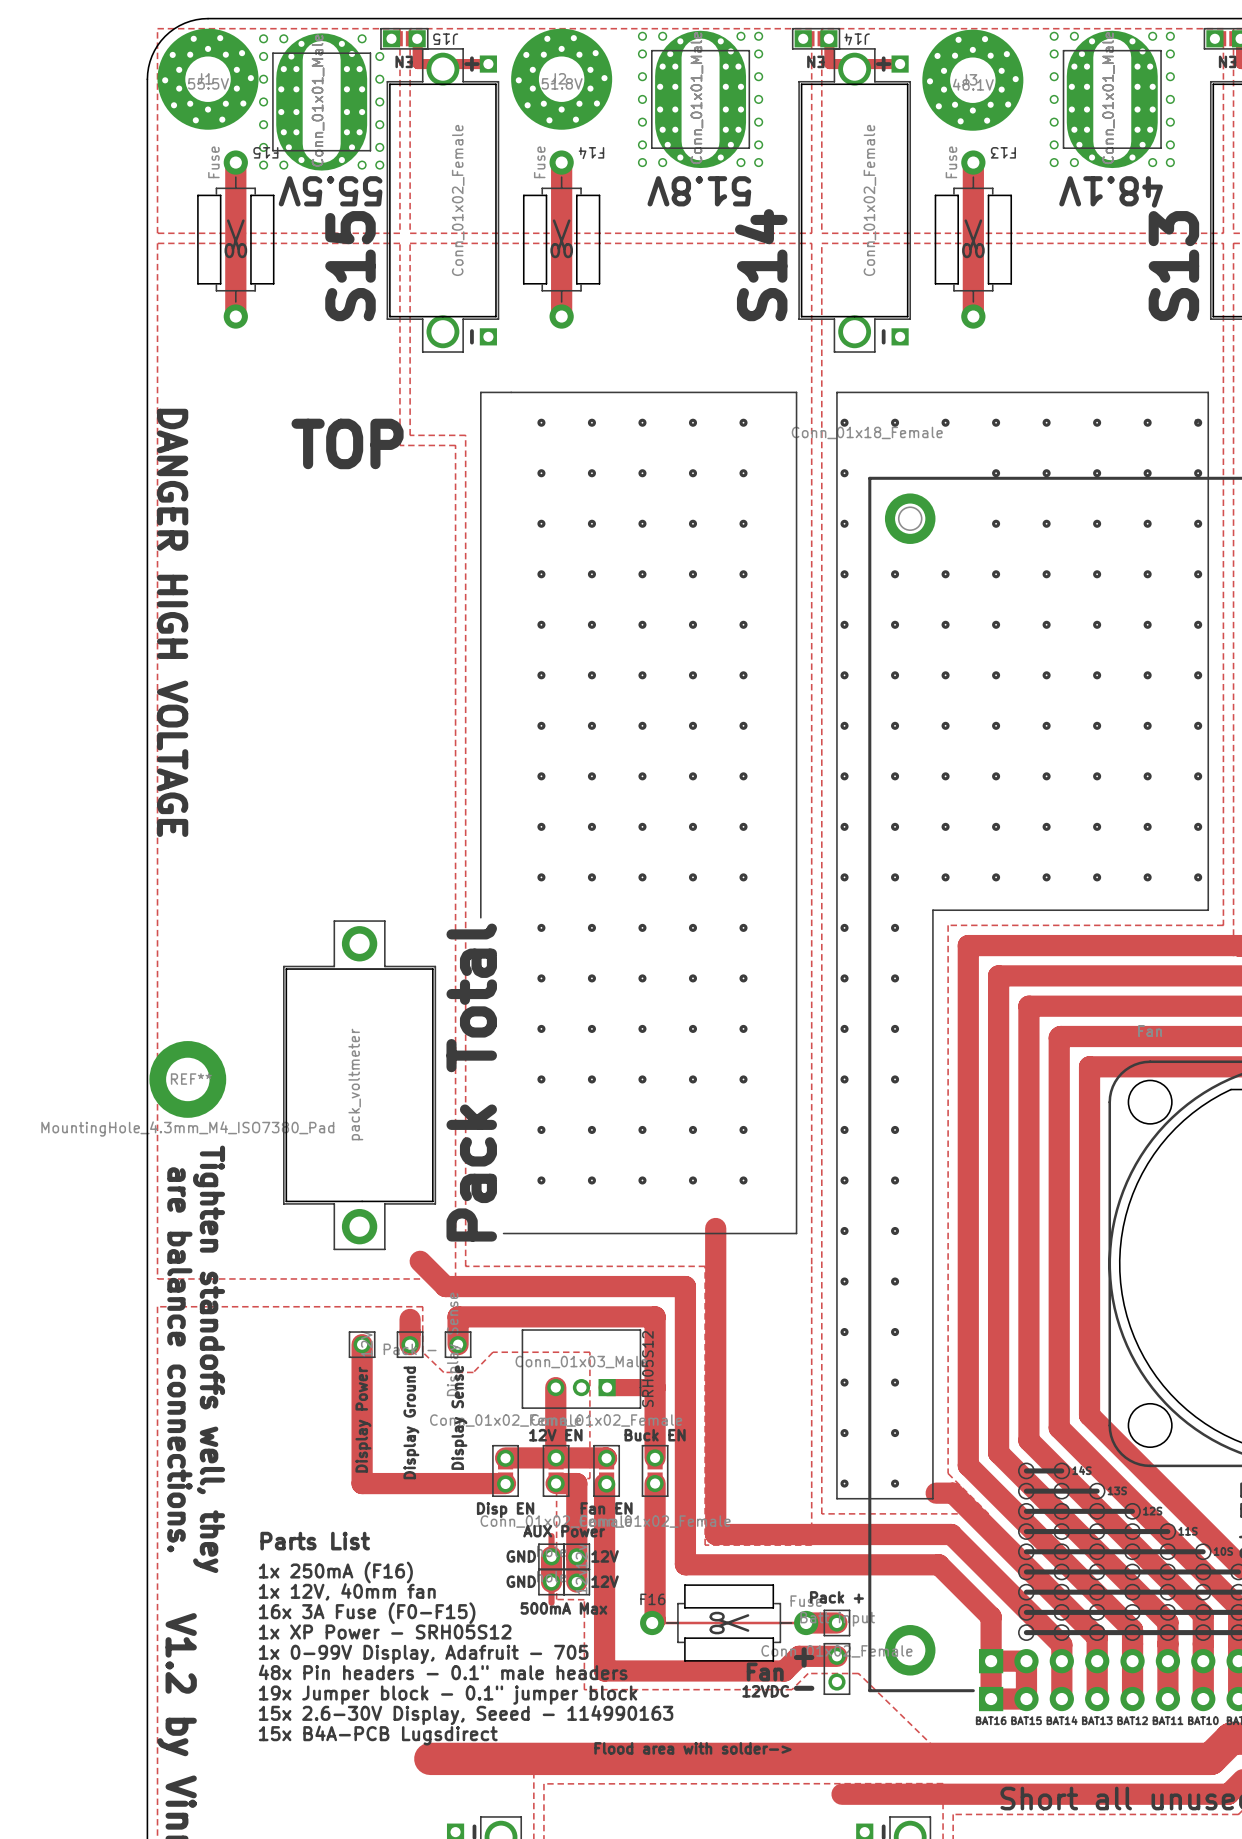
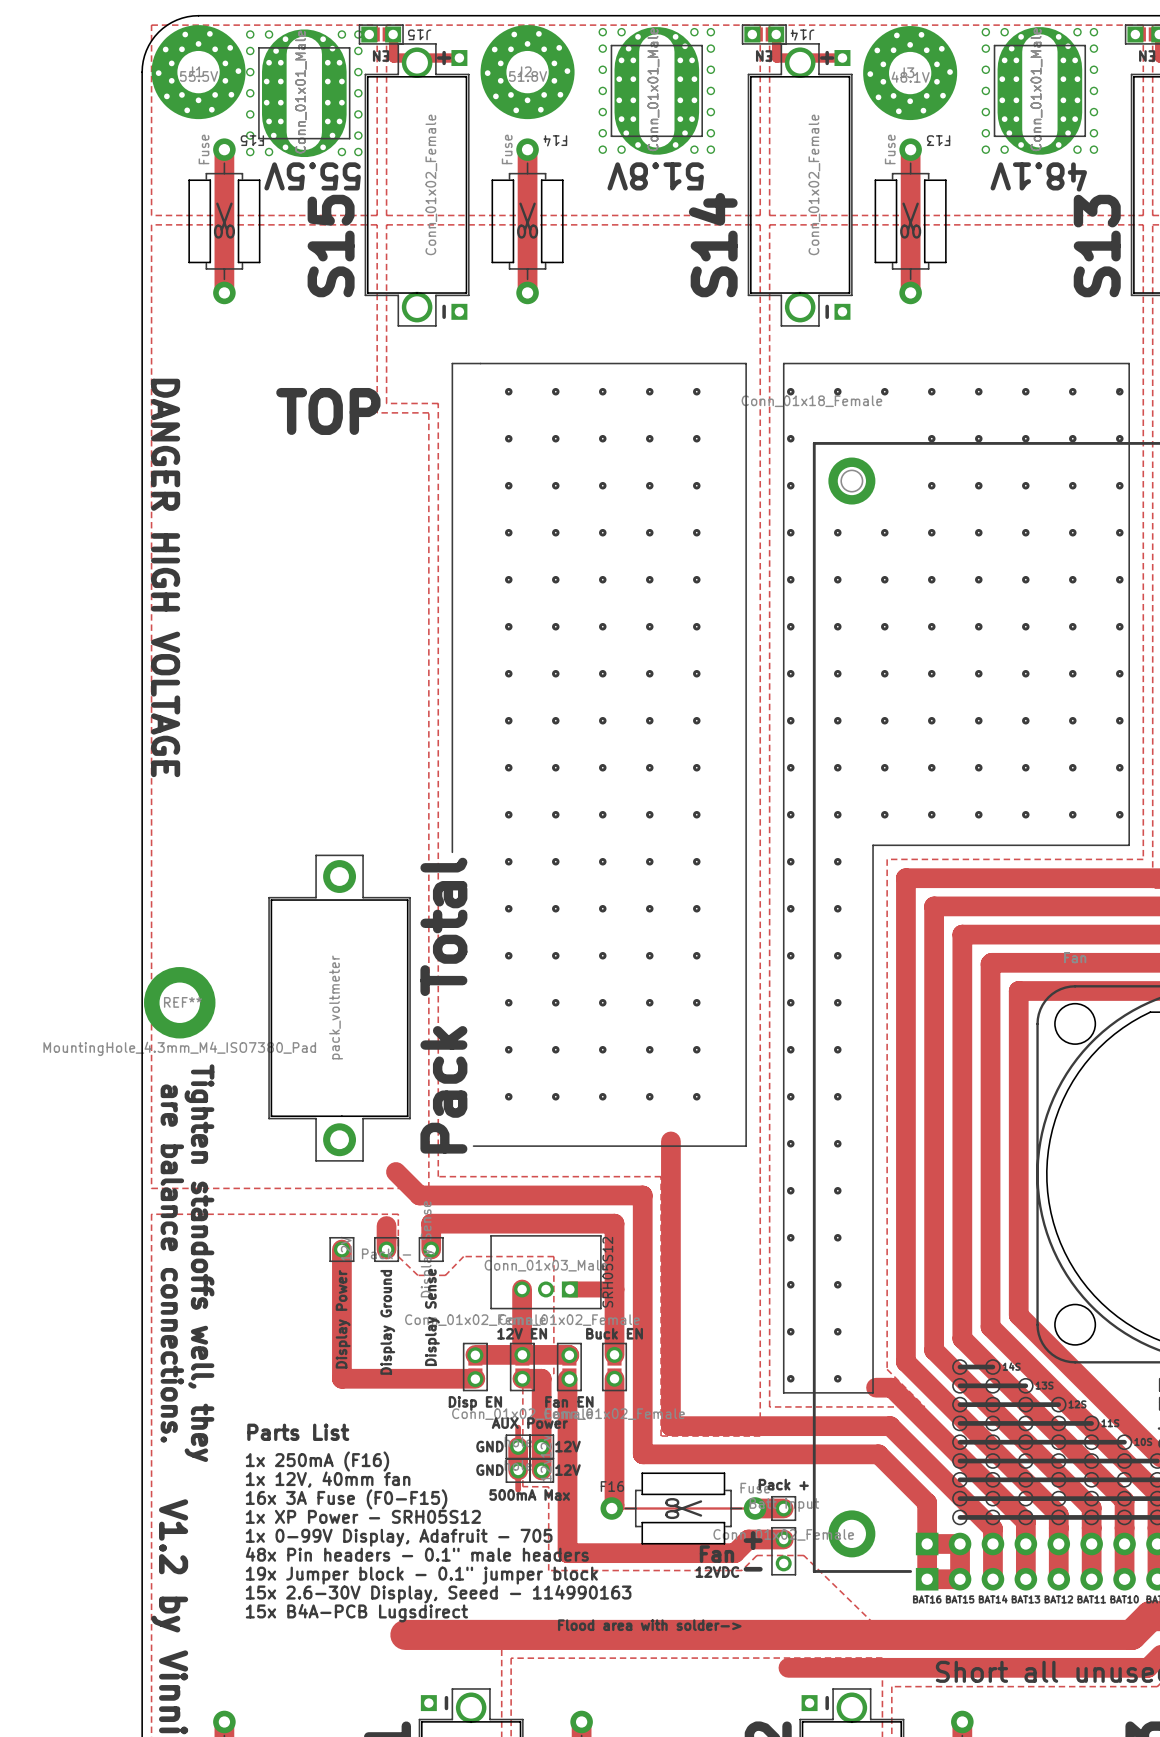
part footprint: [259, 33, 385, 171] -> [246, 29, 363, 158]

